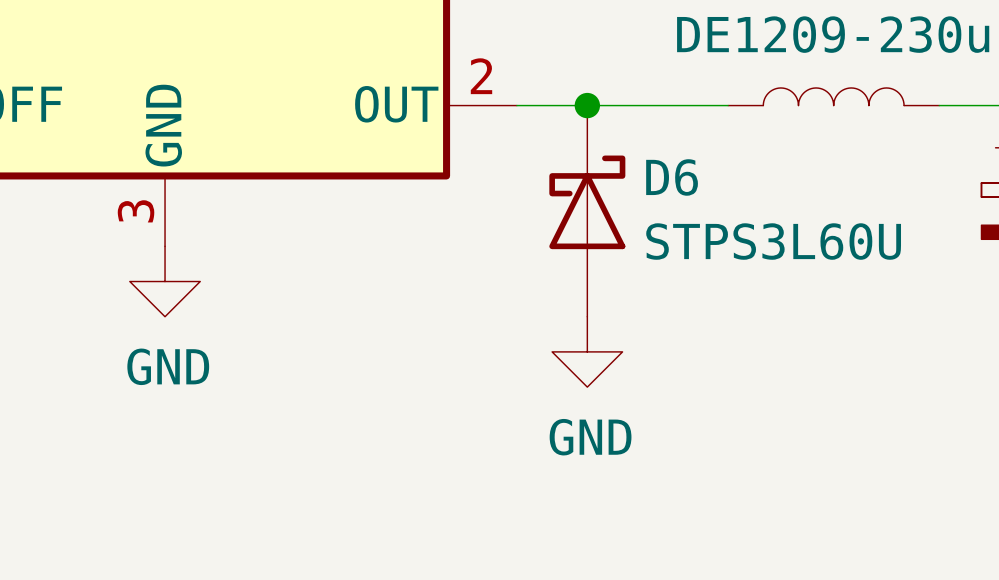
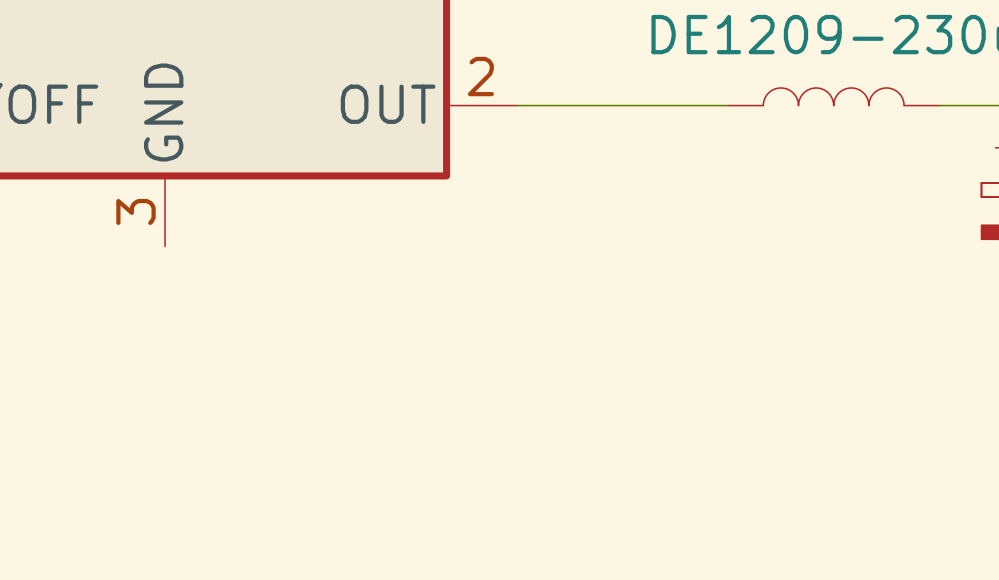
junction: (587, 105) -> none
D6: STPS3L60U (587, 211) -> none
power symbol: GND (165, 281) -> none
power symbol: GND (587, 351) -> none

